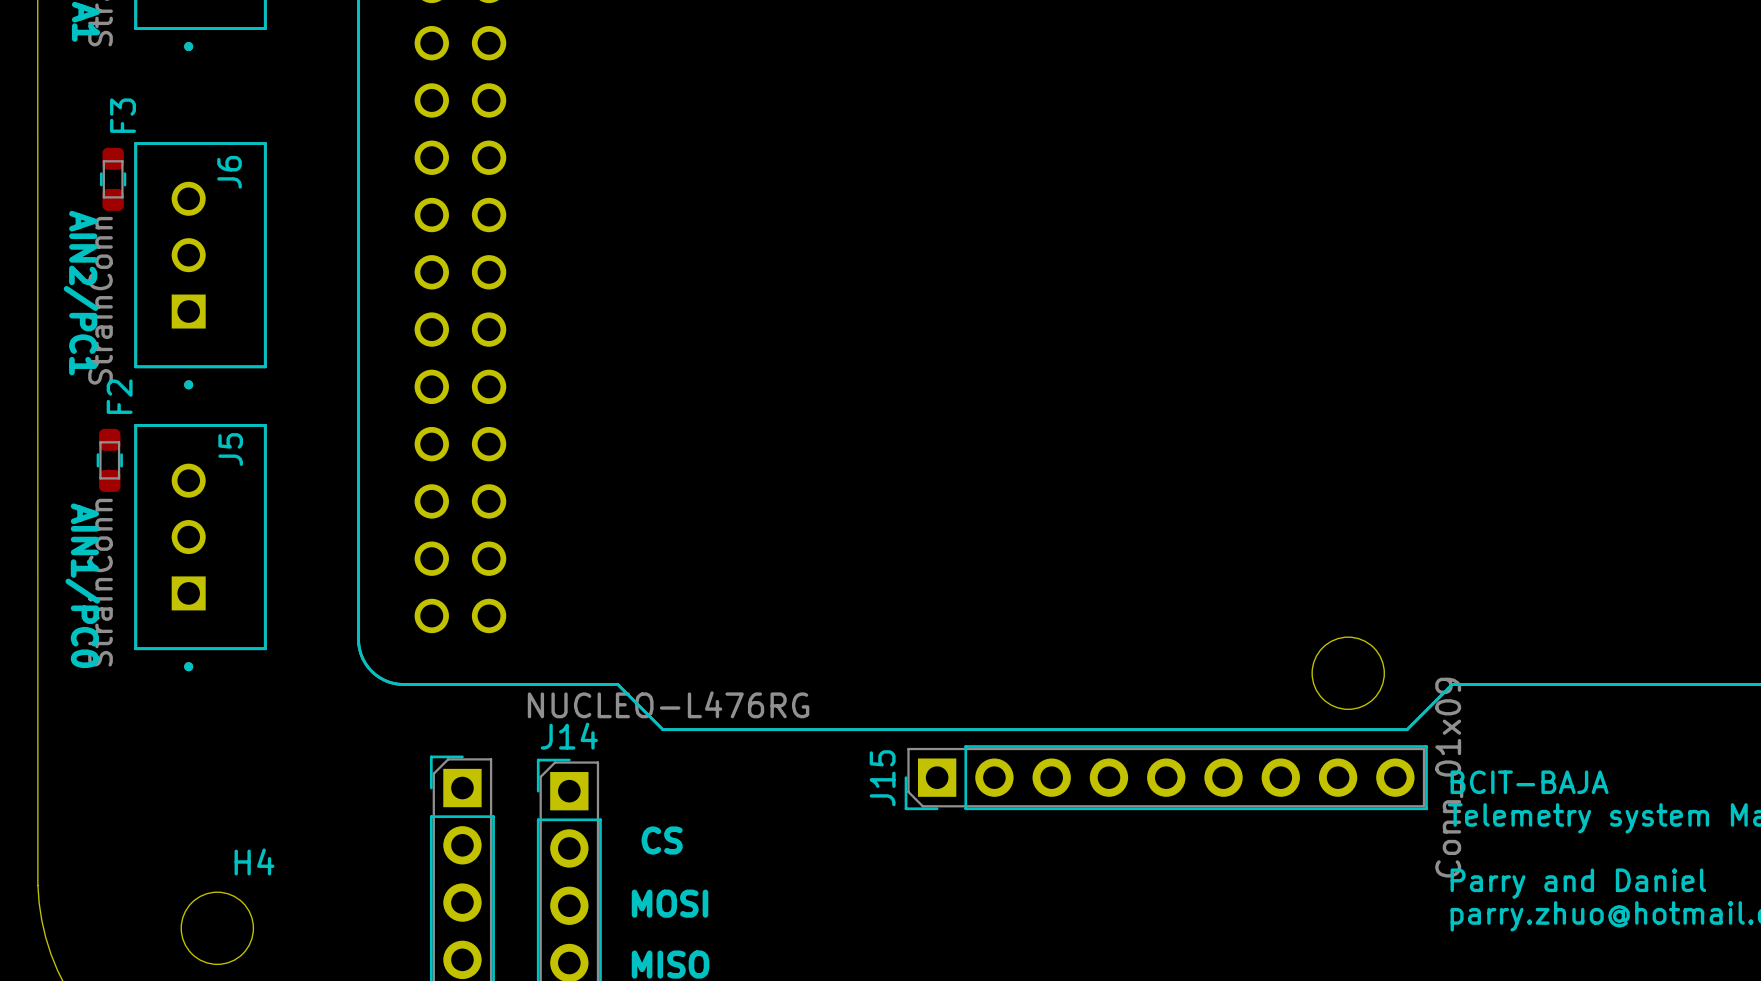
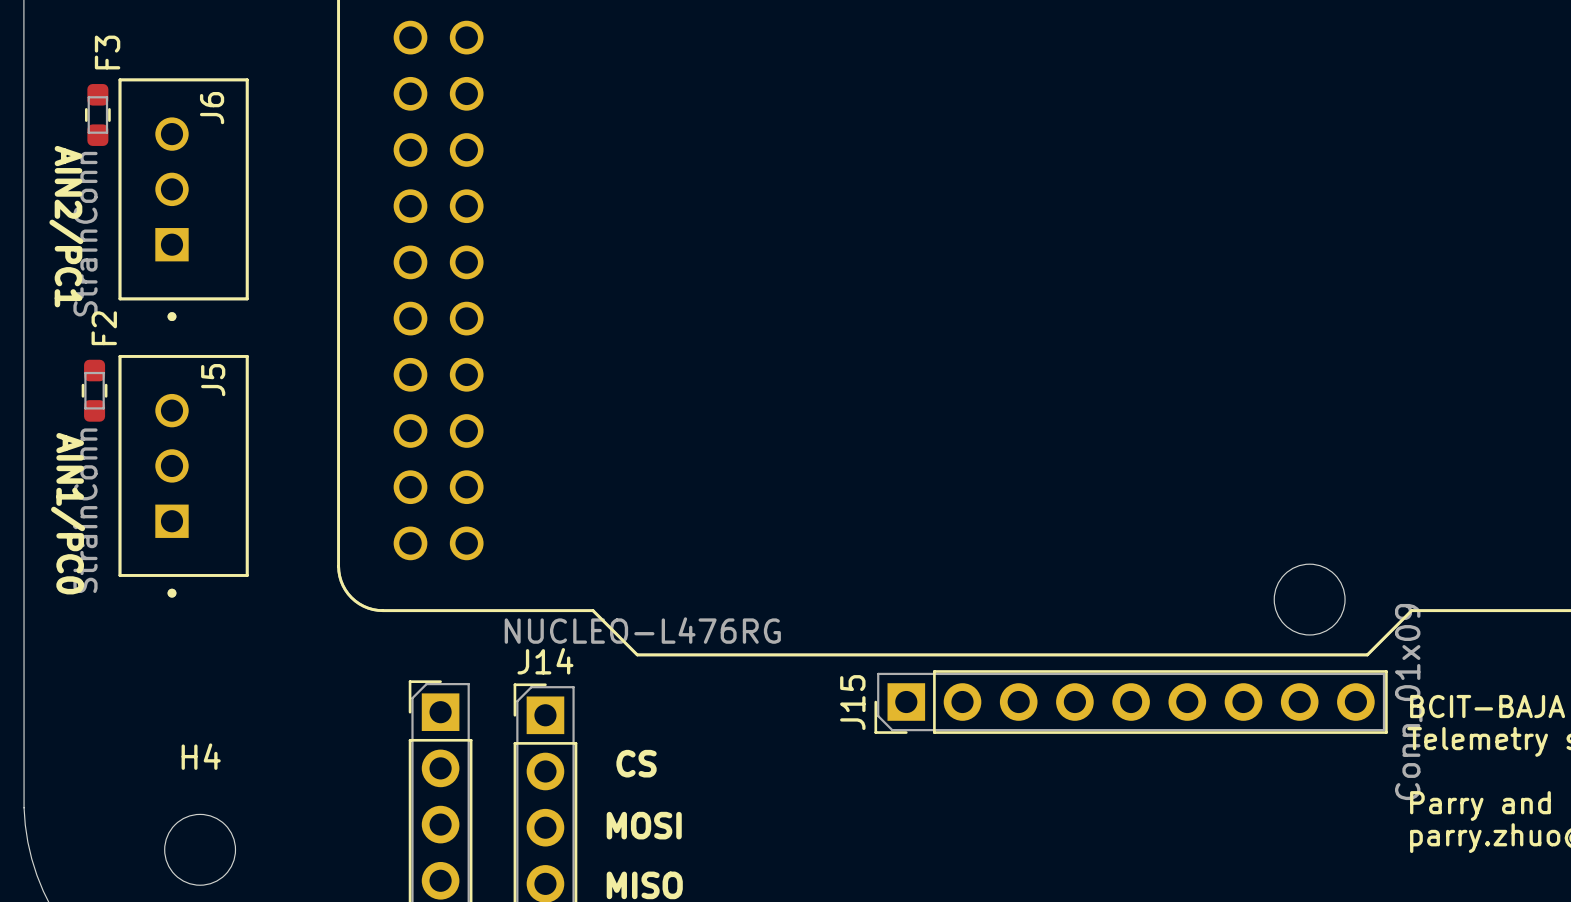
H4 name position: H4 (254, 861) -> H4 (201, 756)

